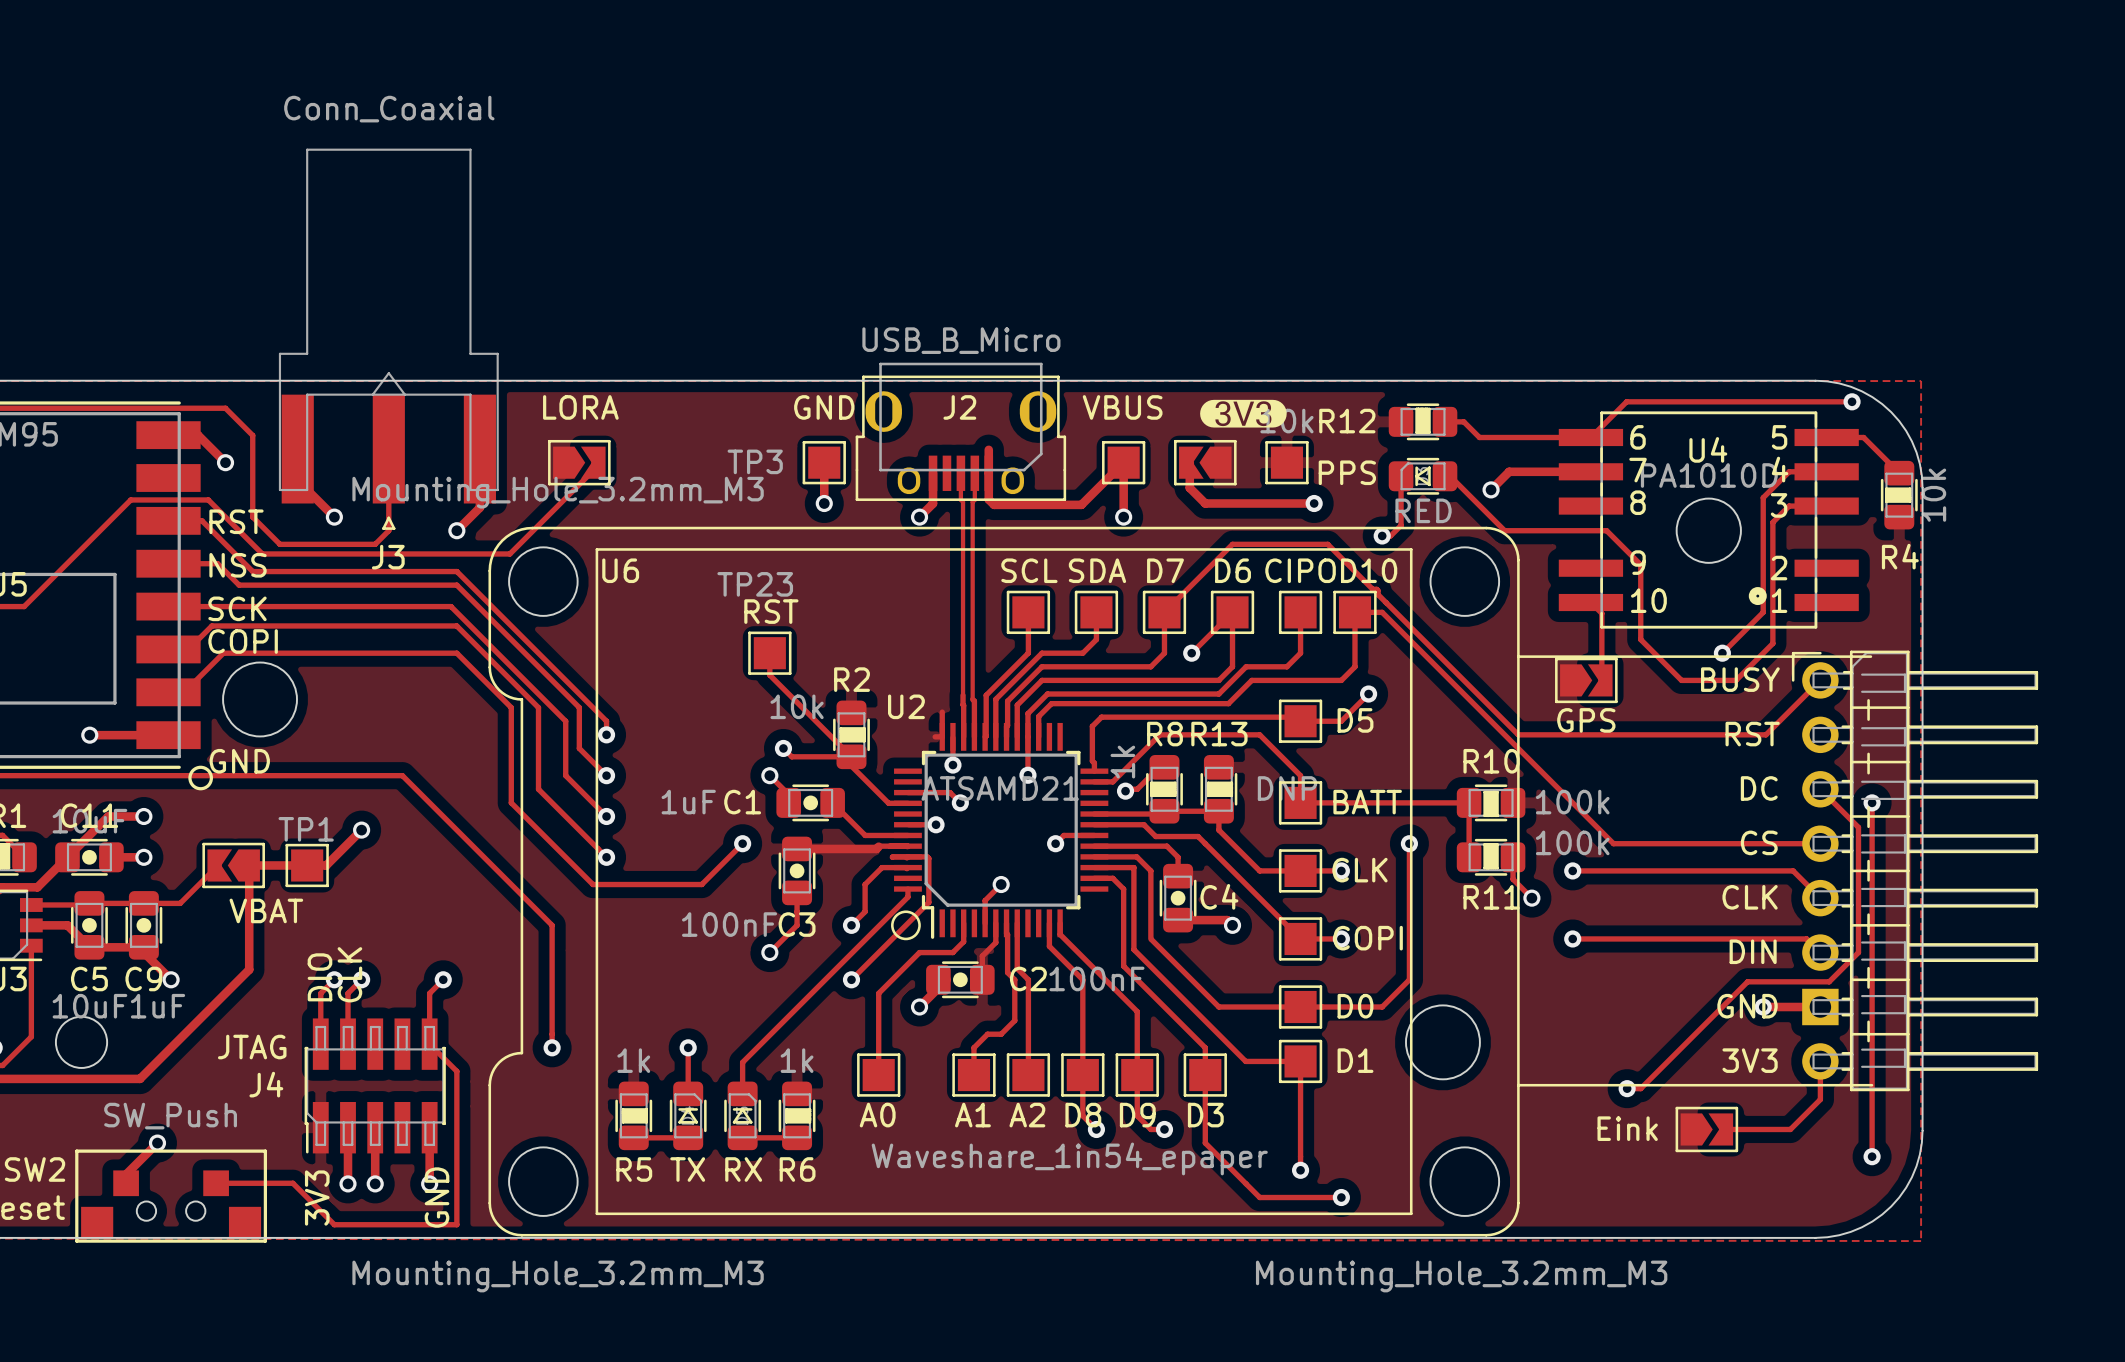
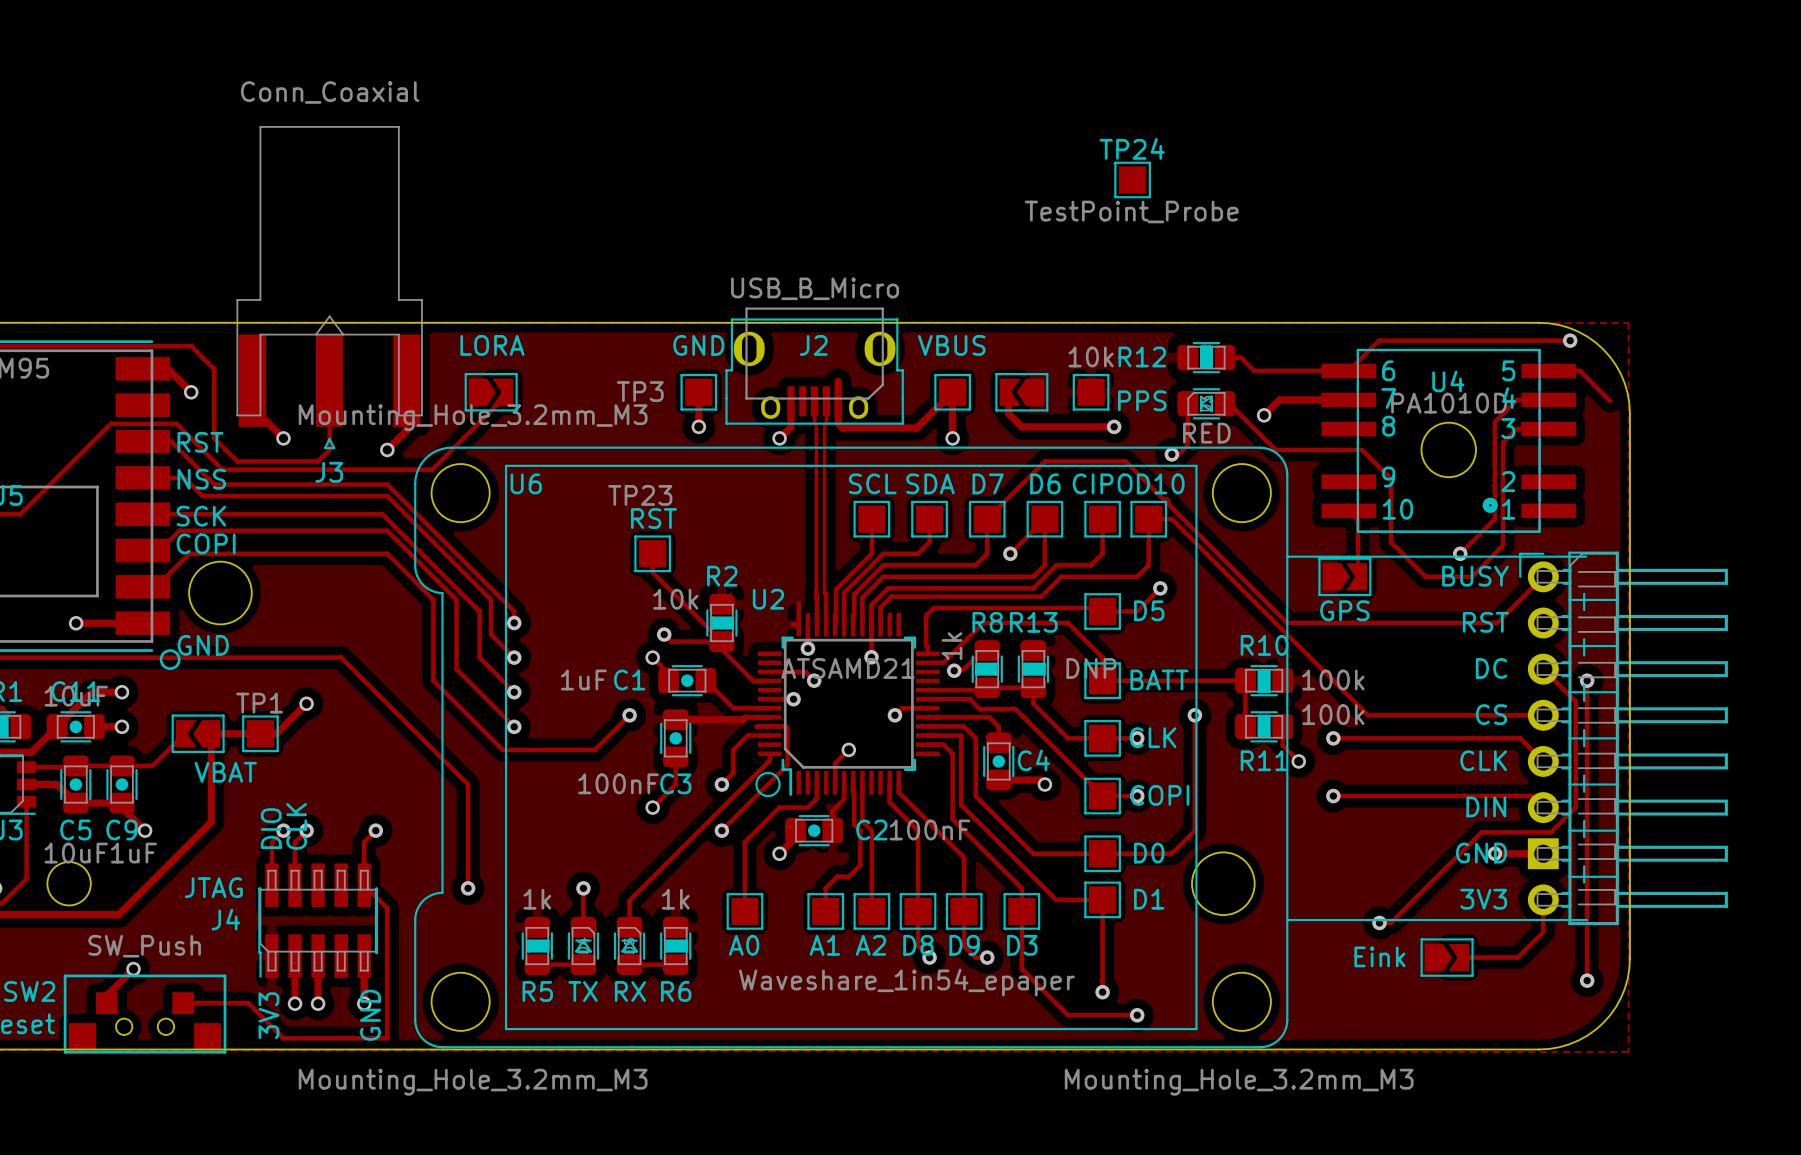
TP24: none -> TestPoint_Probe (1132, 179)
drawing: [1200, 399, 1287, 428] -> none
R4: 10k (1899, 495) -> none

